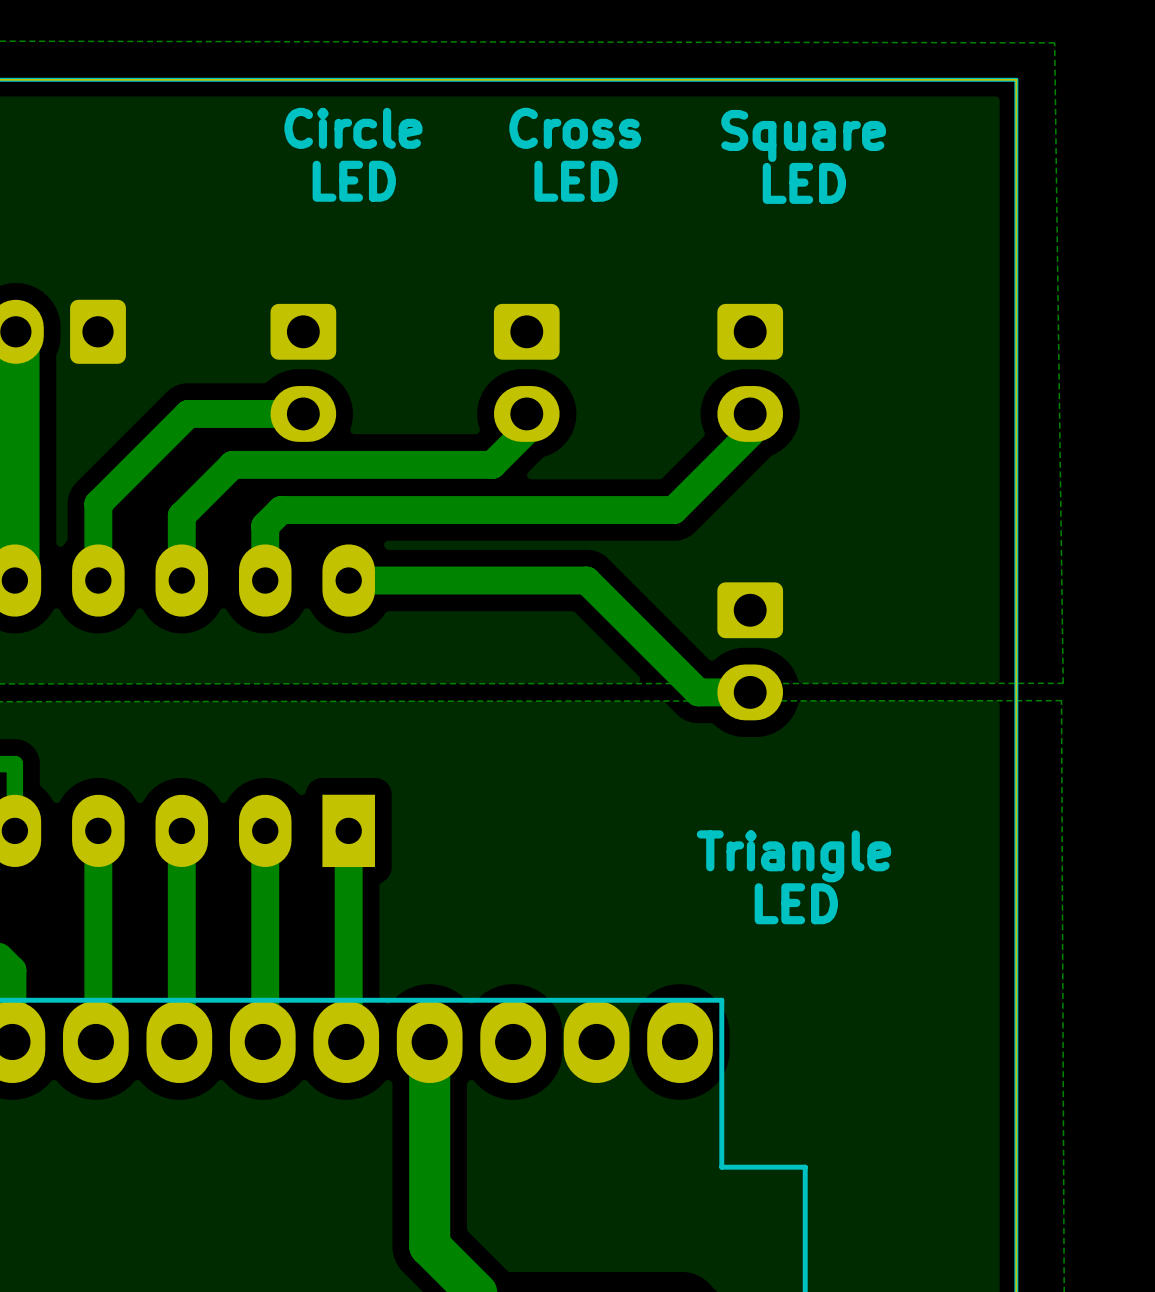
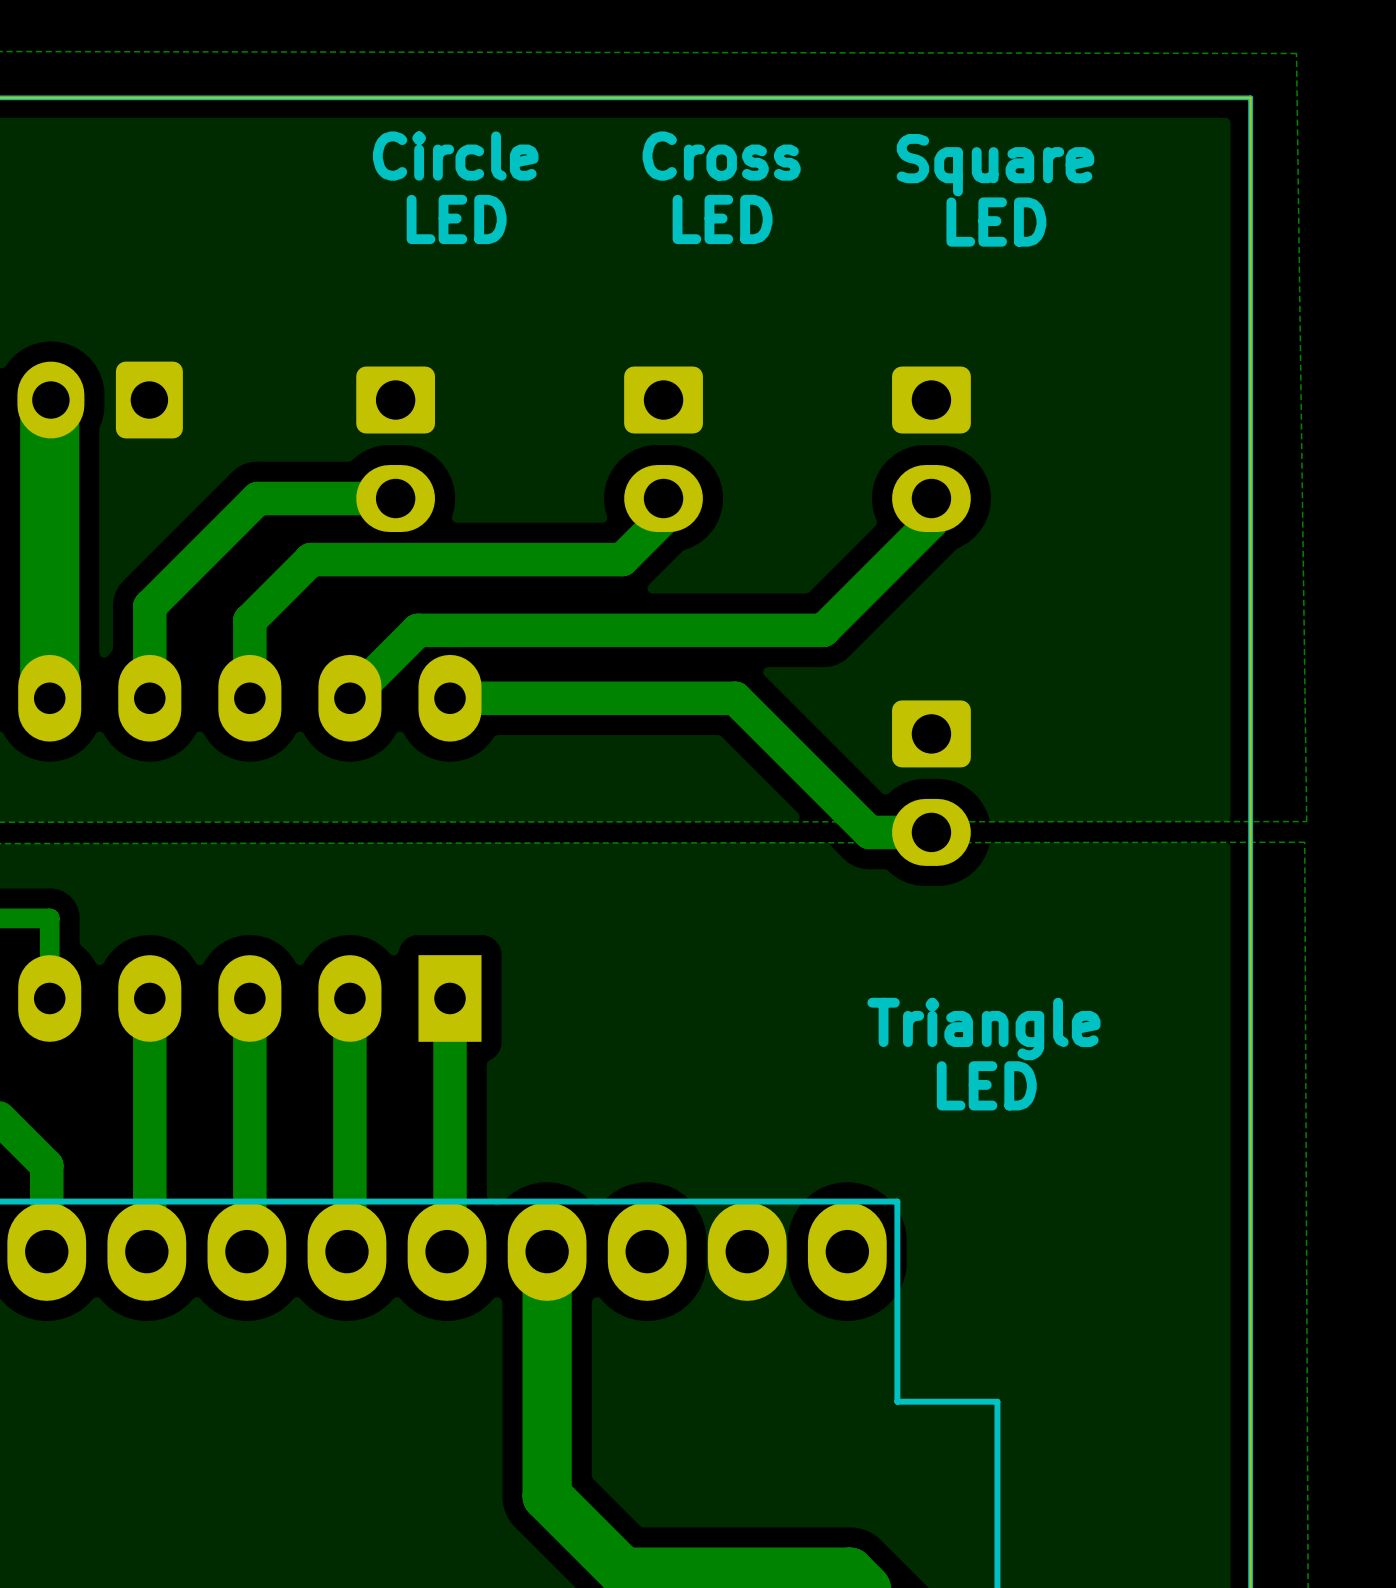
track: (673, 510) (281, 510) (265, 525) (265, 580) -> (839, 613) (823, 630) (417, 630) (349, 698)

